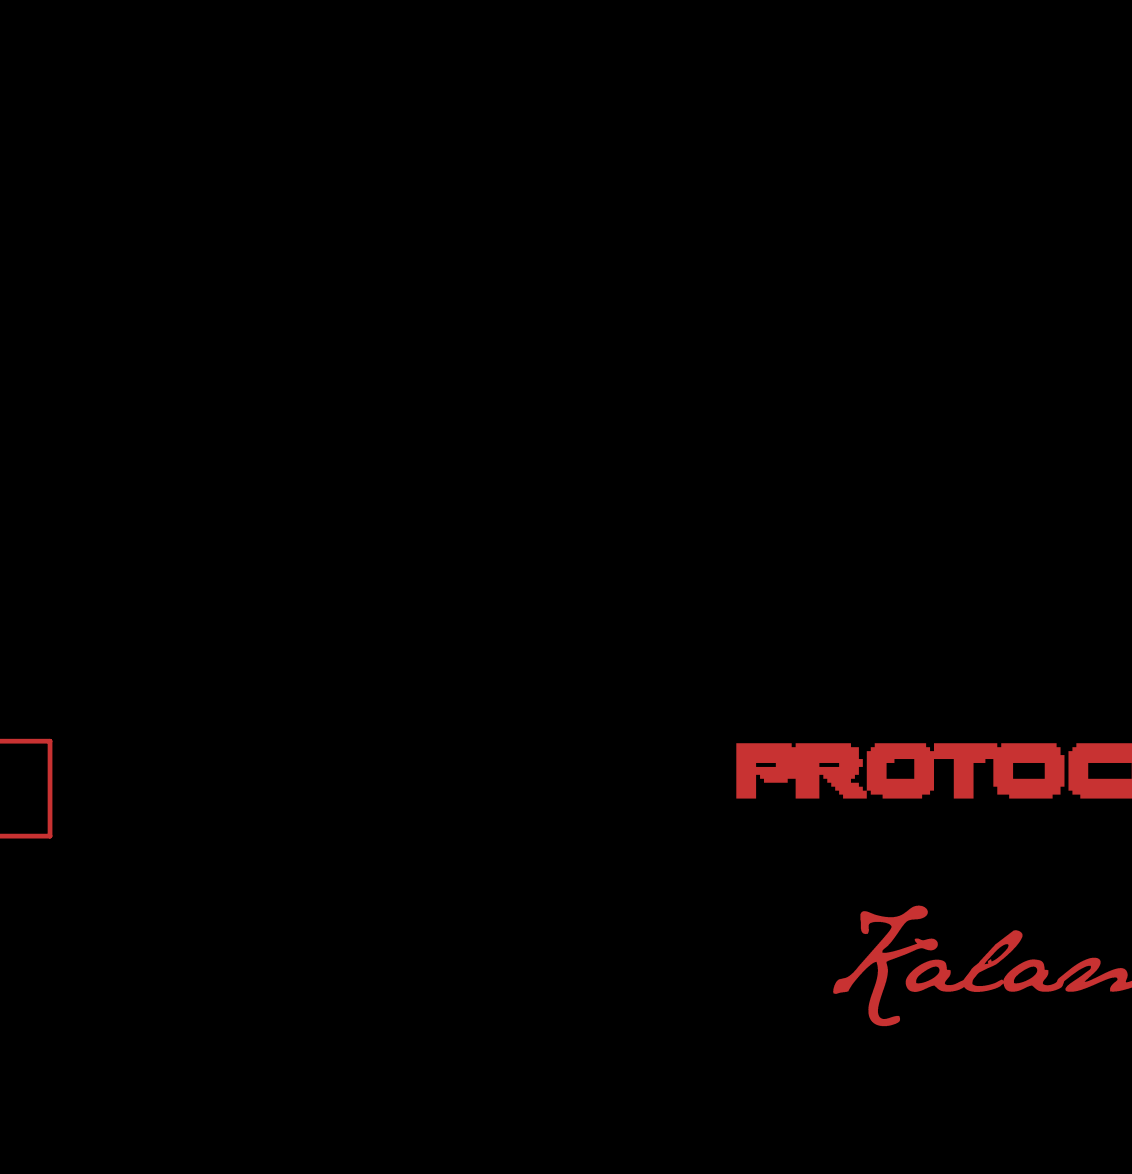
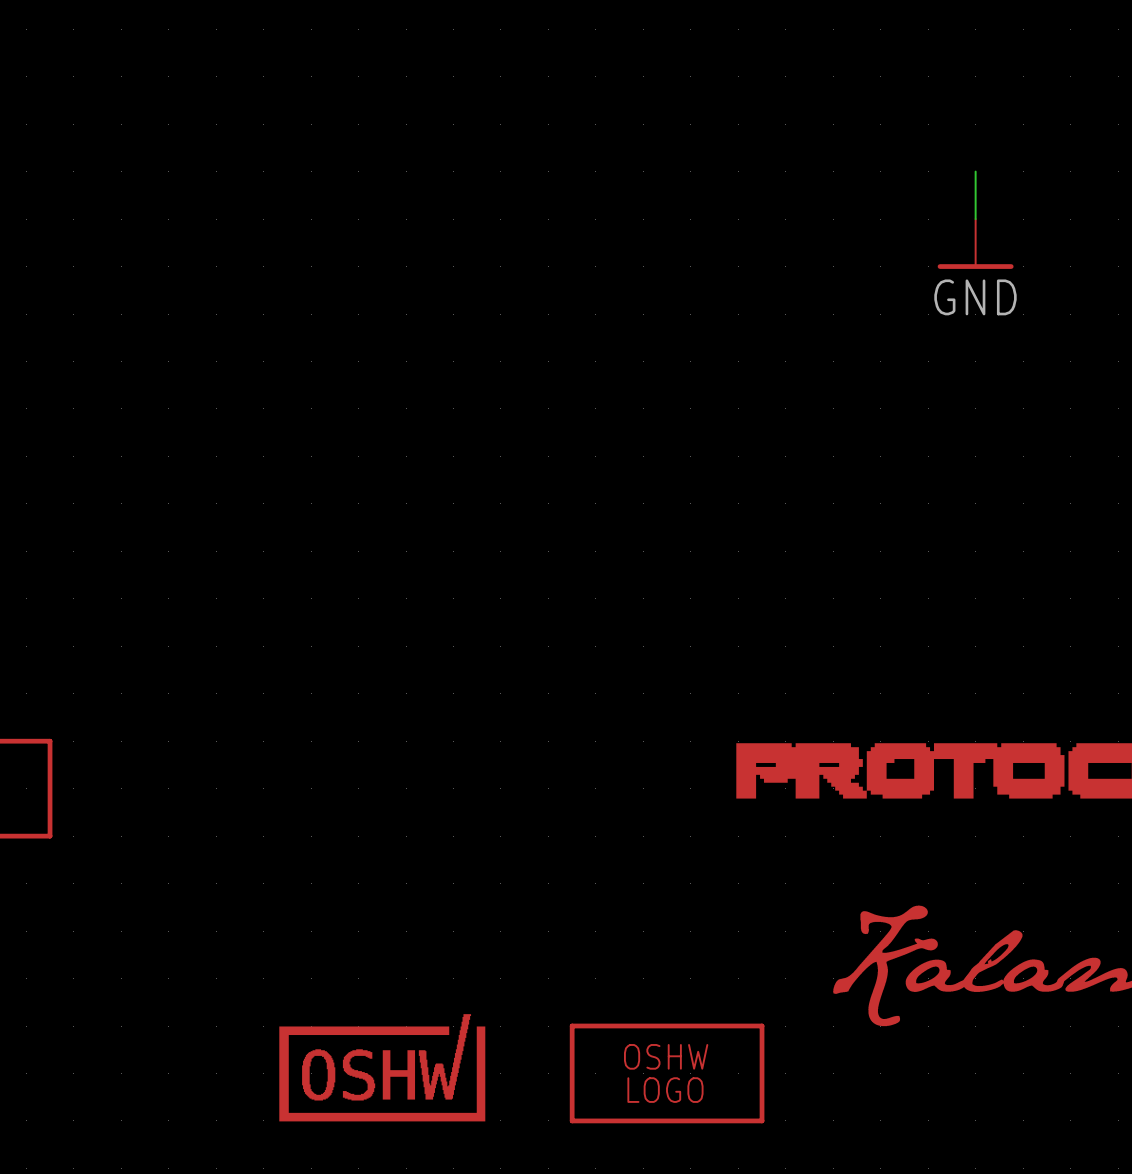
wire: none -> (975, 171) (975, 219)
power symbol: none -> GND (975, 243)
part: none -> (382, 1067)
part: none -> (667, 1073)

